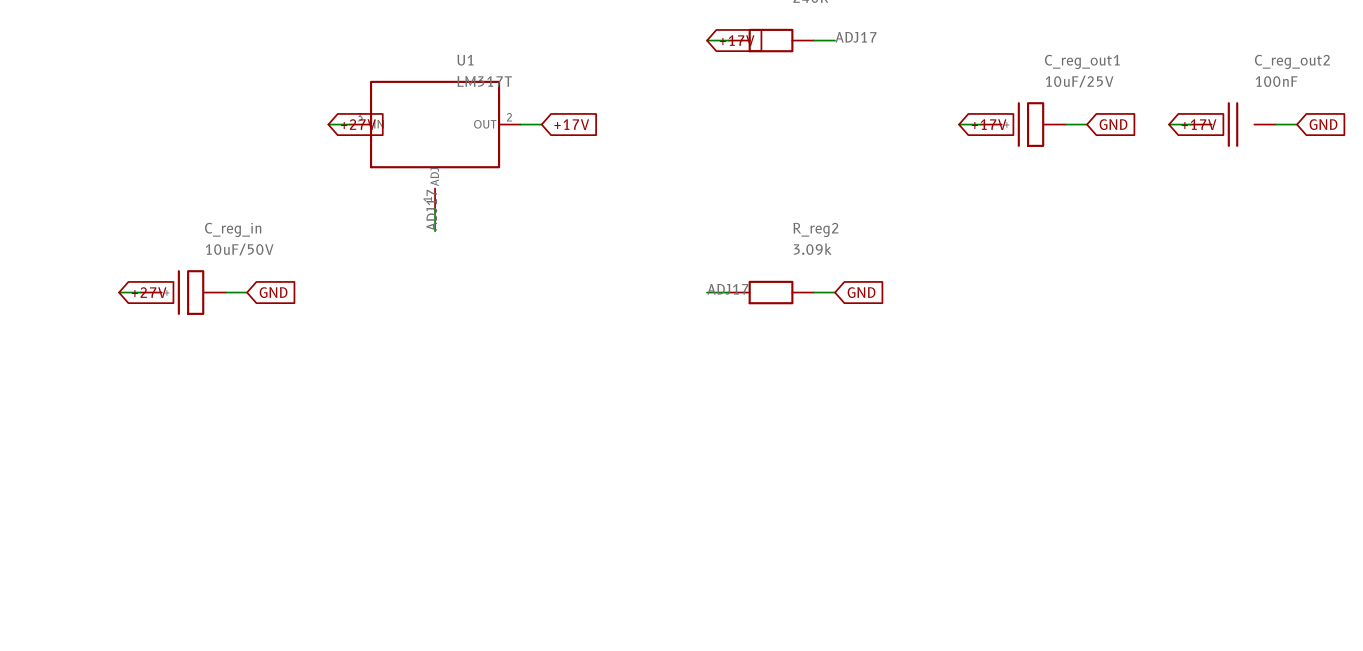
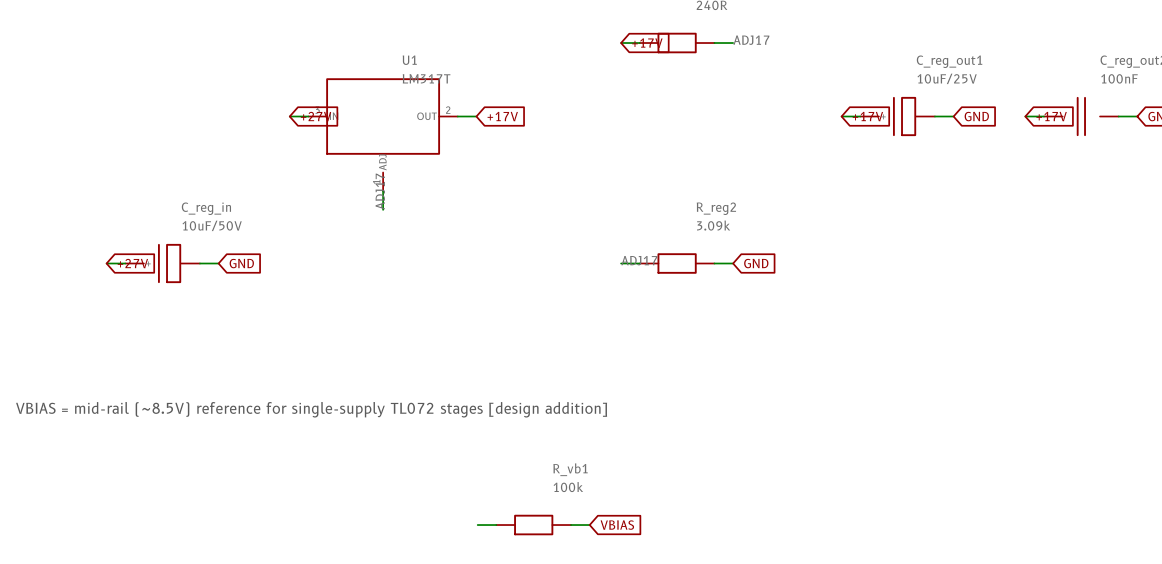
text: none -> VBIAS = mid-rail (~8.5V) reference for single-supply TL072 stages [design addition] (311, 409)
wire: none -> (477, 525) (496, 525)
R_vb1: none -> 100k (533, 525)
wire: none -> (571, 525) (589, 525)
global label: none -> VBIAS (617, 525)

